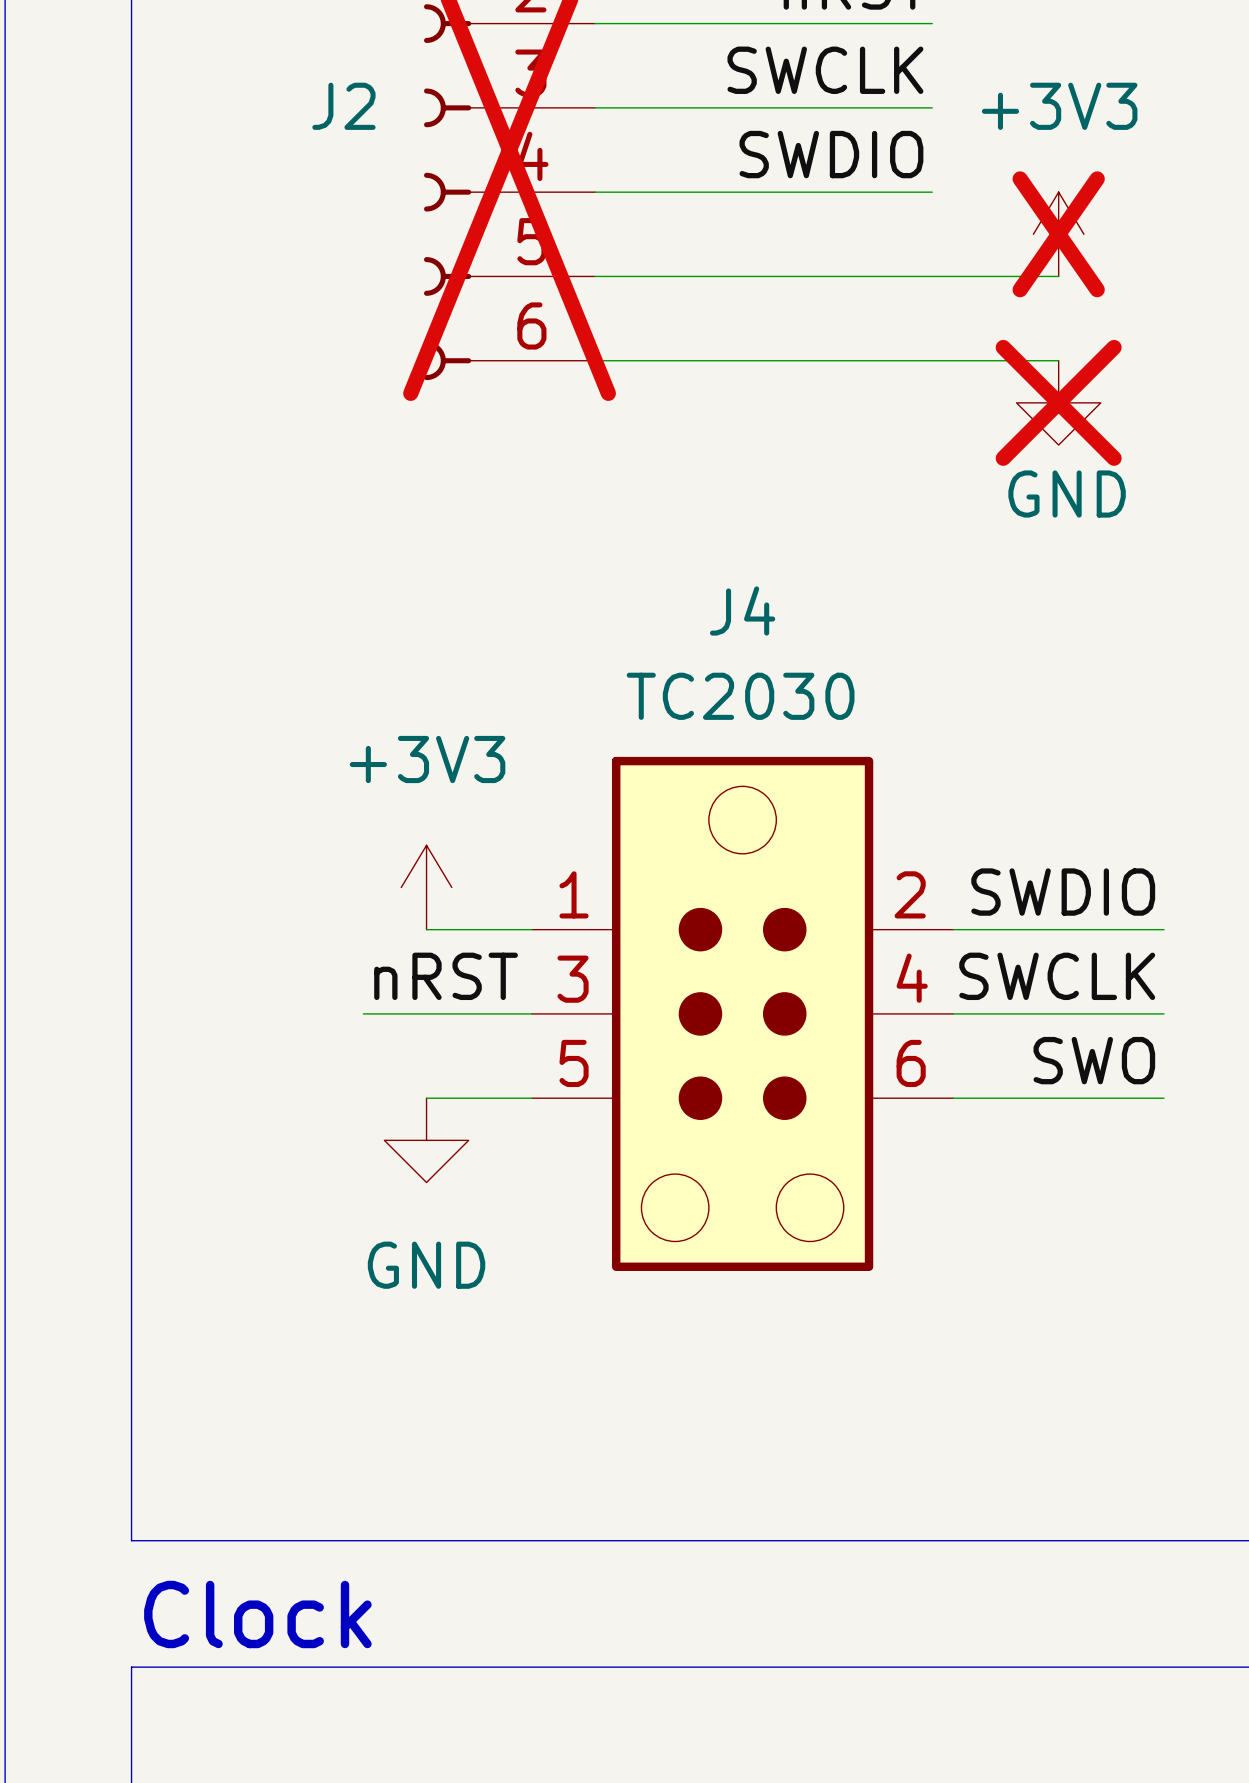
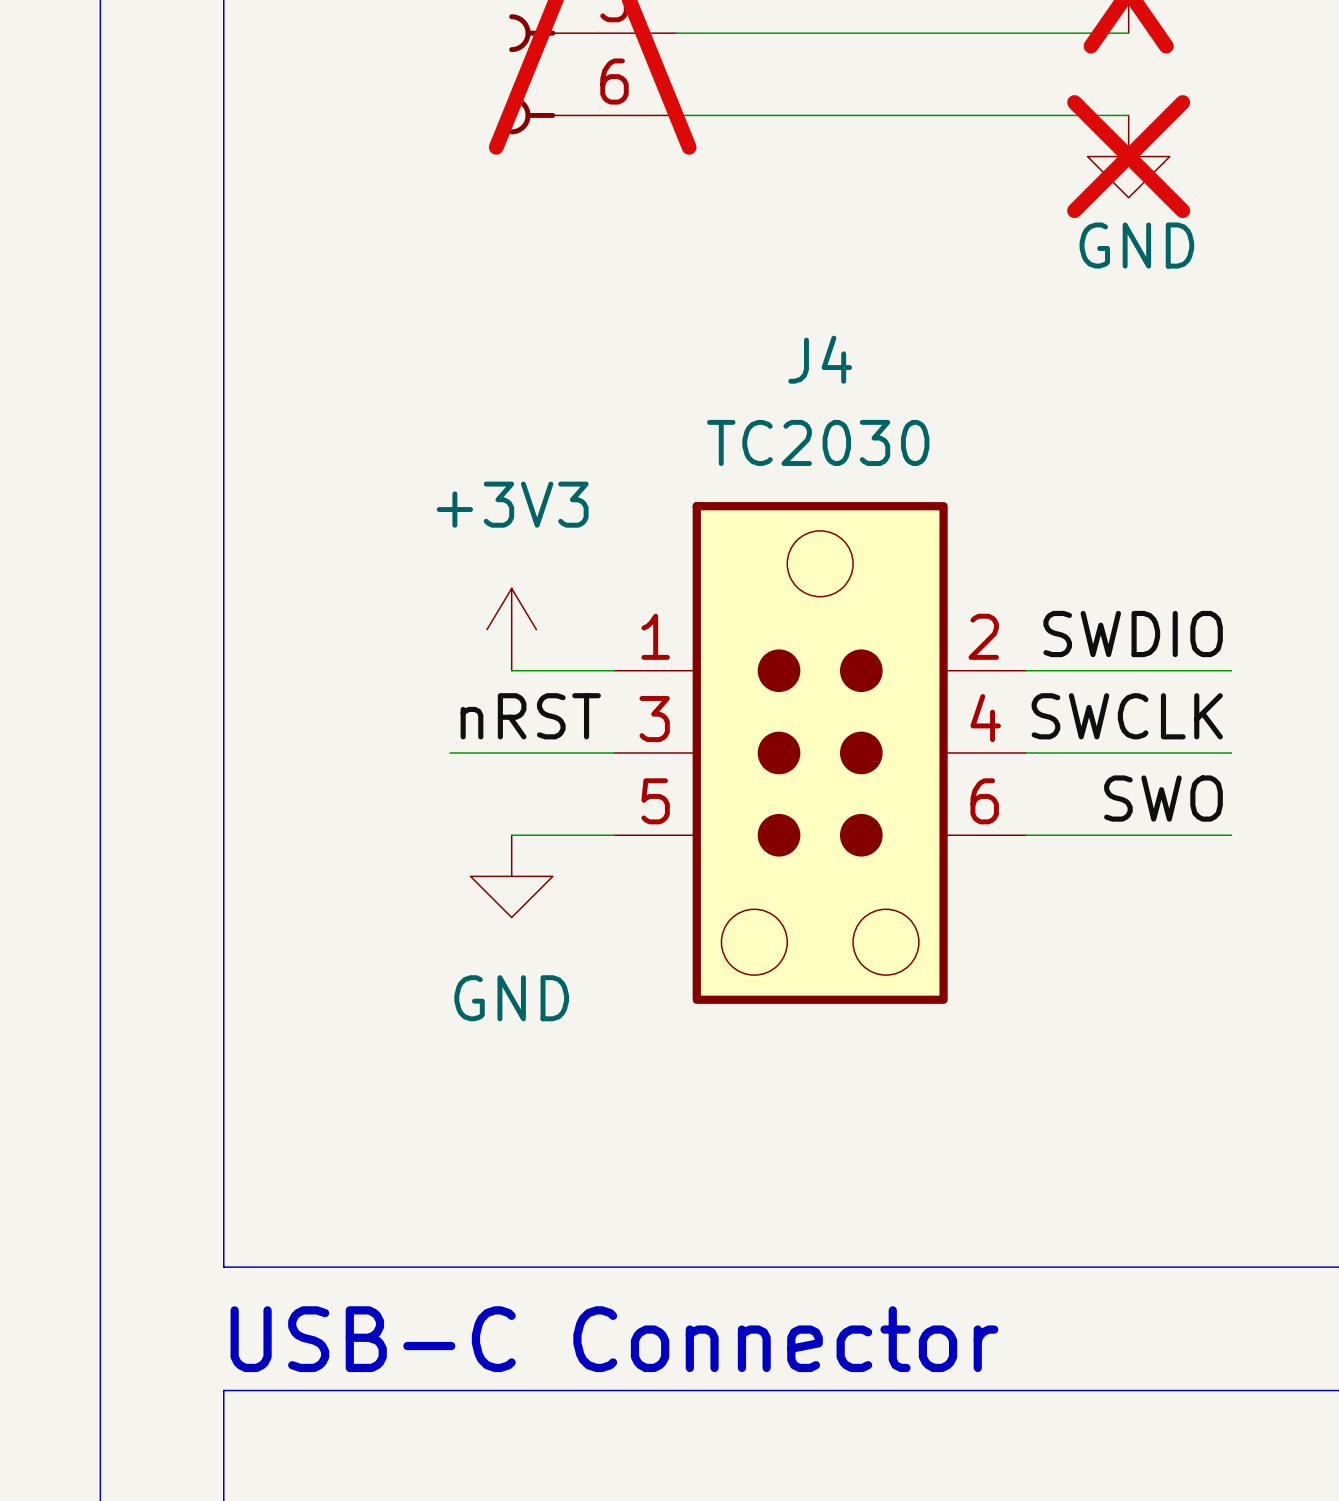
text: Clock (257, 1614) -> USB-C Connector (614, 1339)

